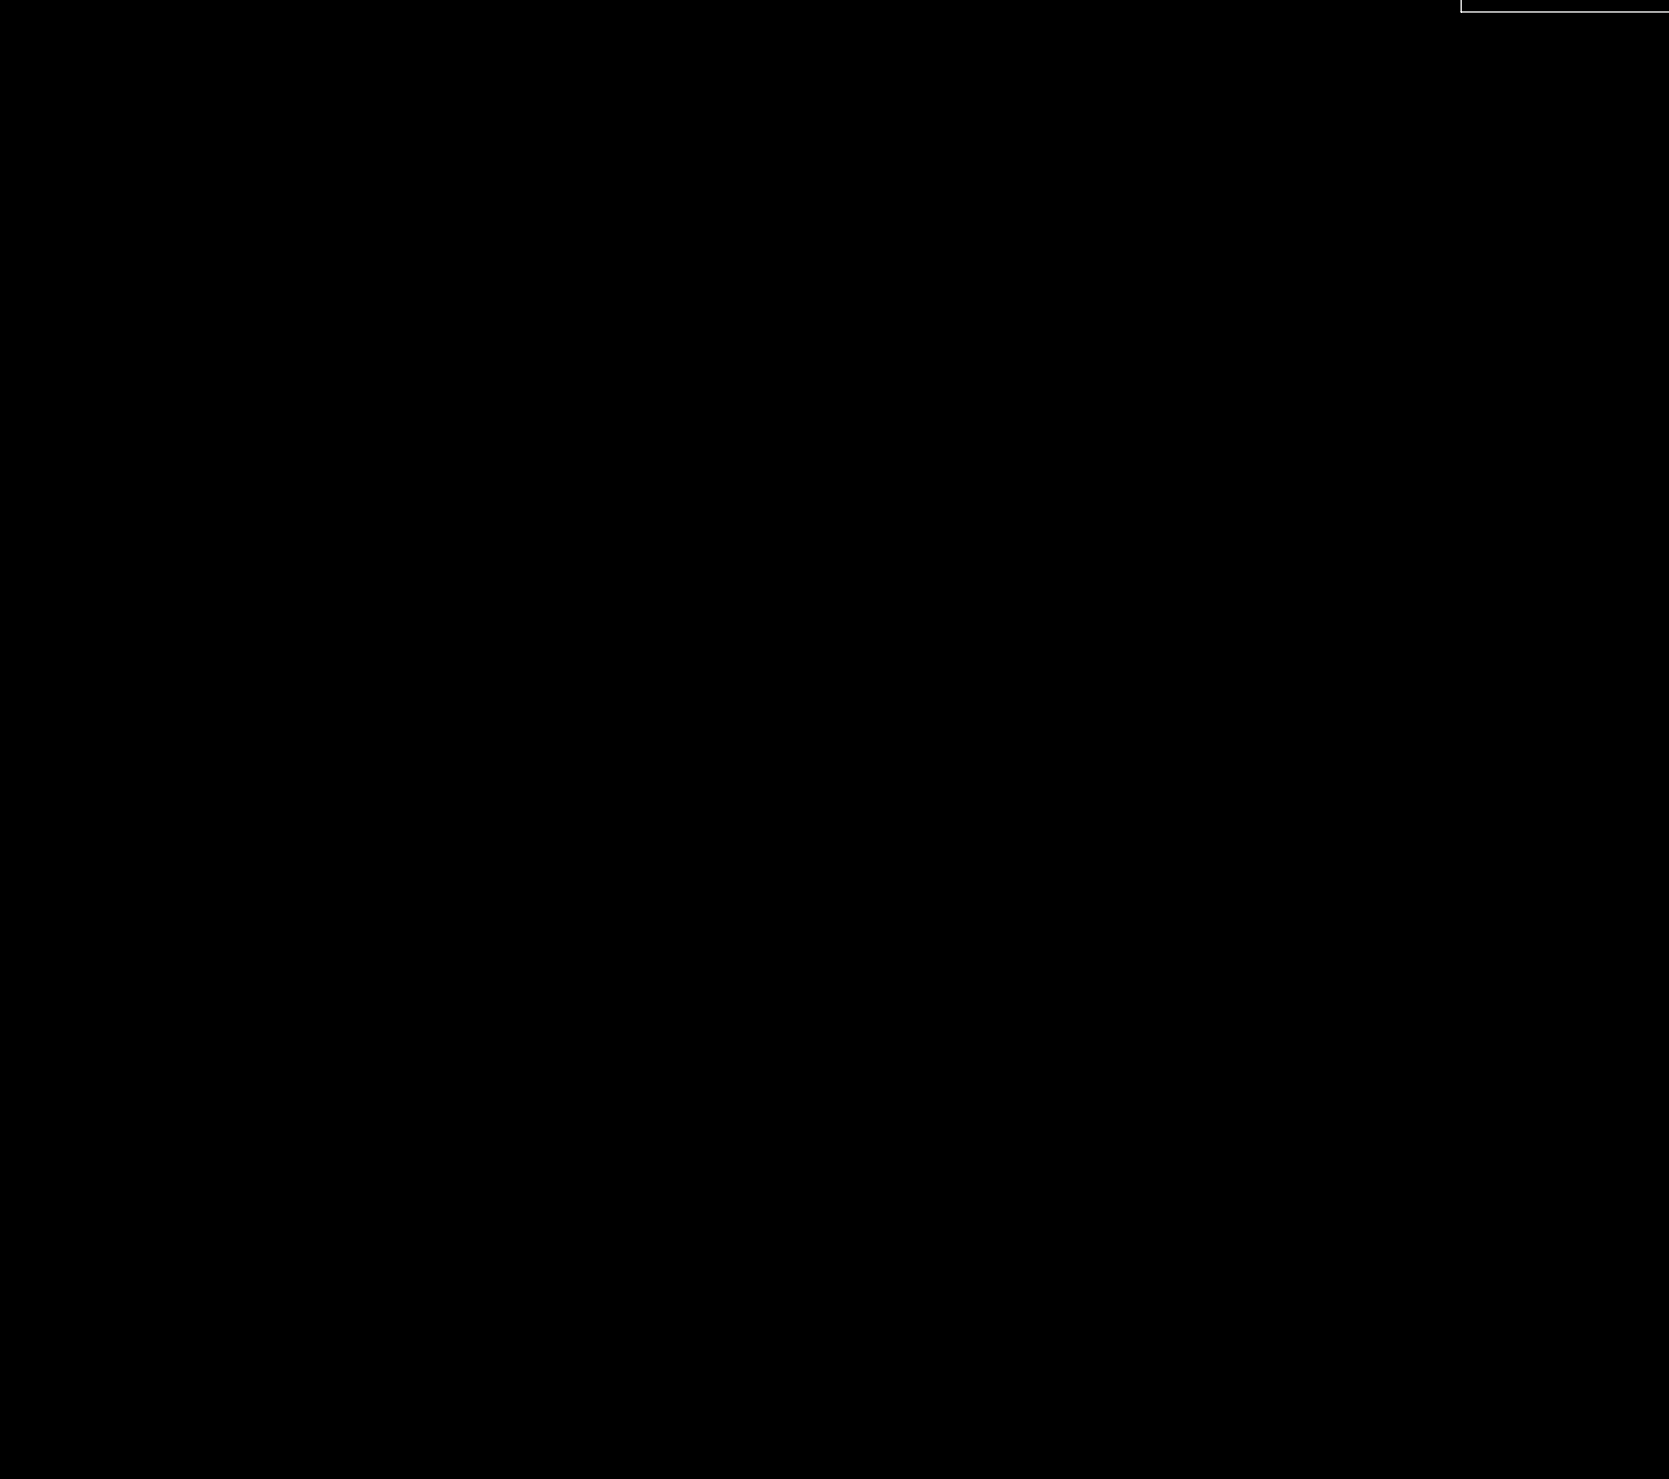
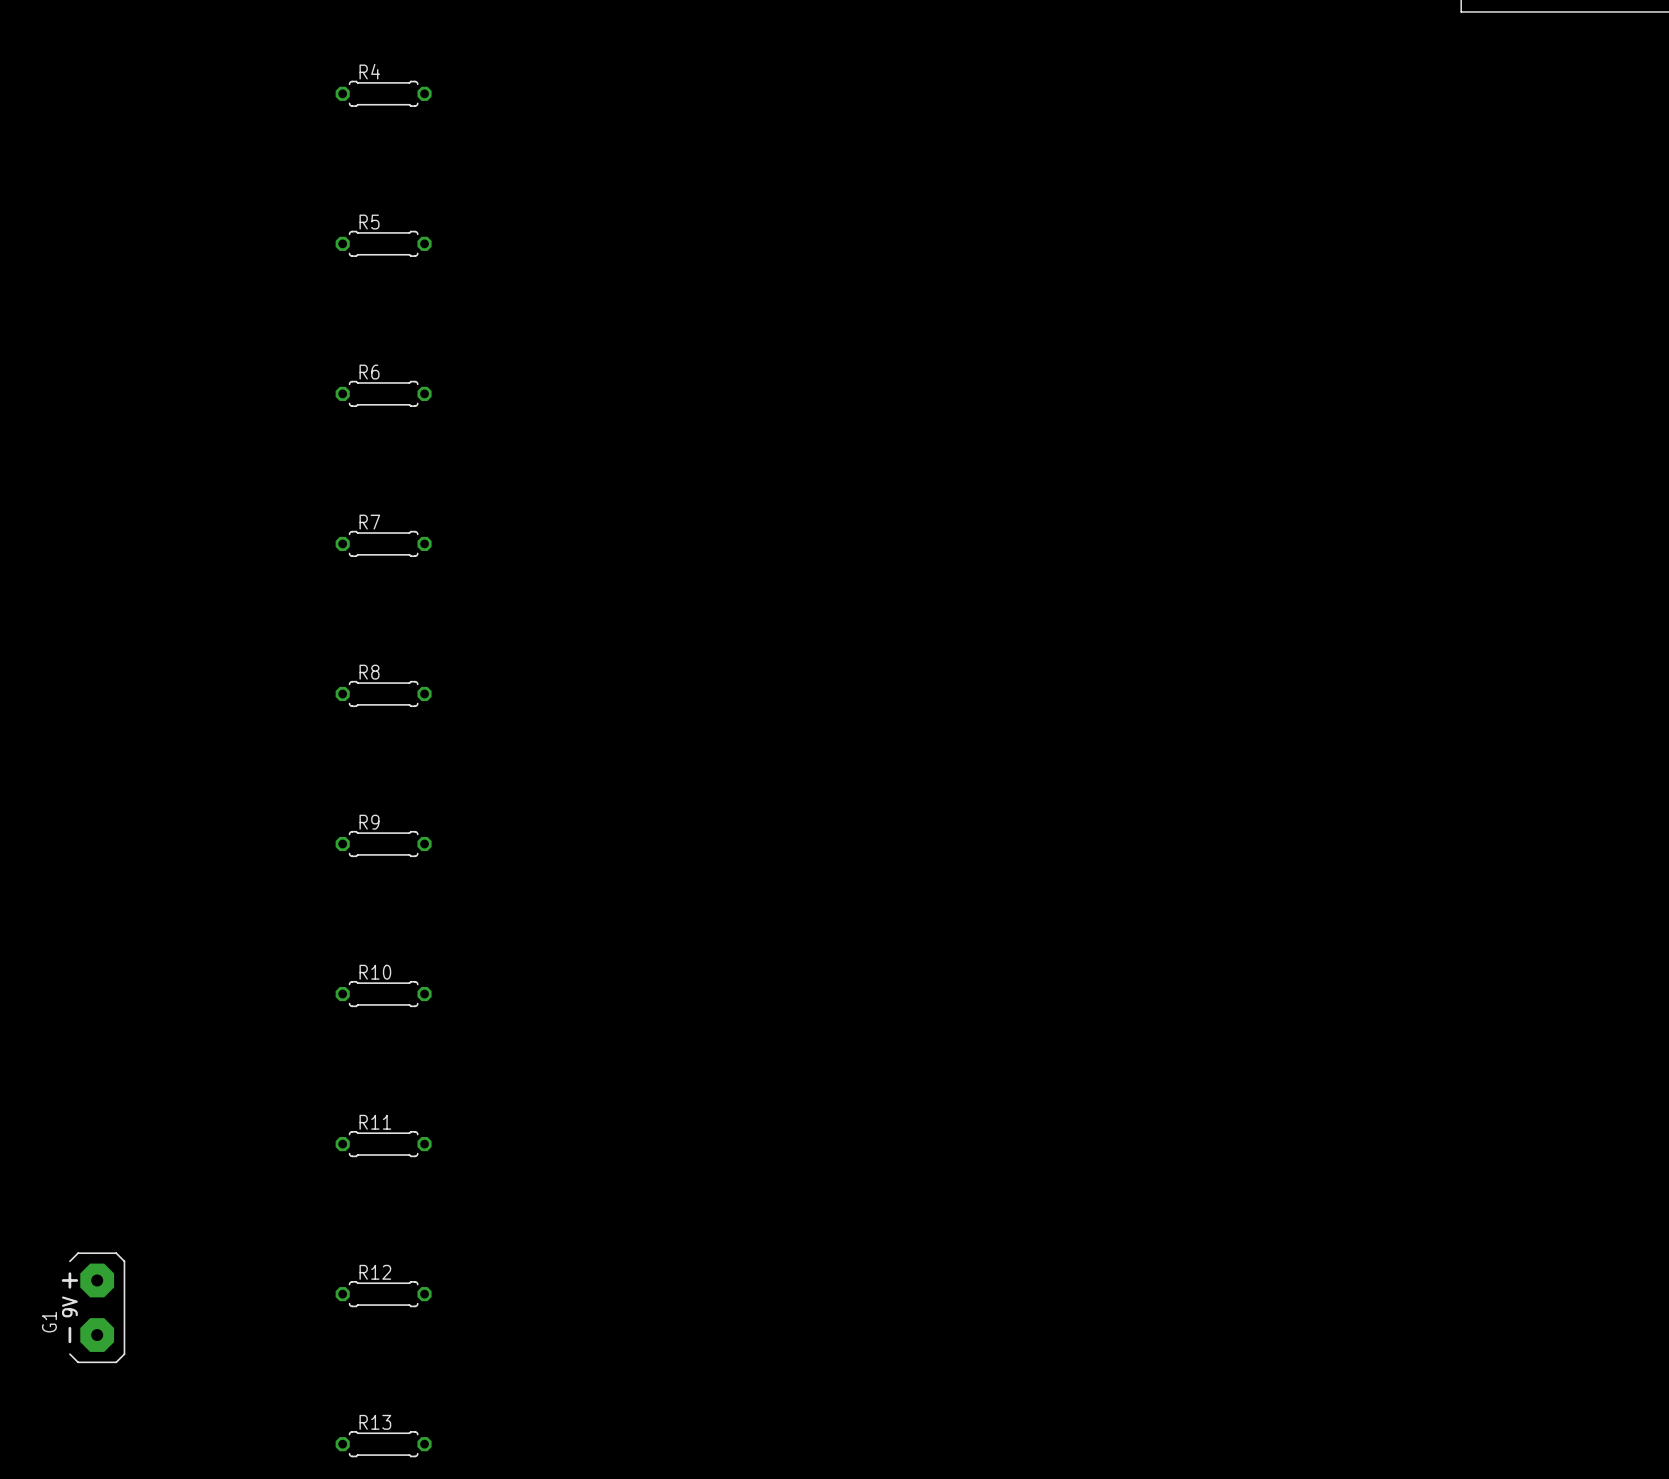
R4: none -> (383, 93)
R5: none -> (383, 243)
R6: none -> (383, 393)
R7: none -> (383, 543)
R8: none -> (383, 693)
R9: none -> (383, 844)
R10: none -> (383, 994)
R11: none -> (383, 1144)
R12: none -> (383, 1294)
G1: none -> (93, 1307)
R13: none -> (383, 1444)

